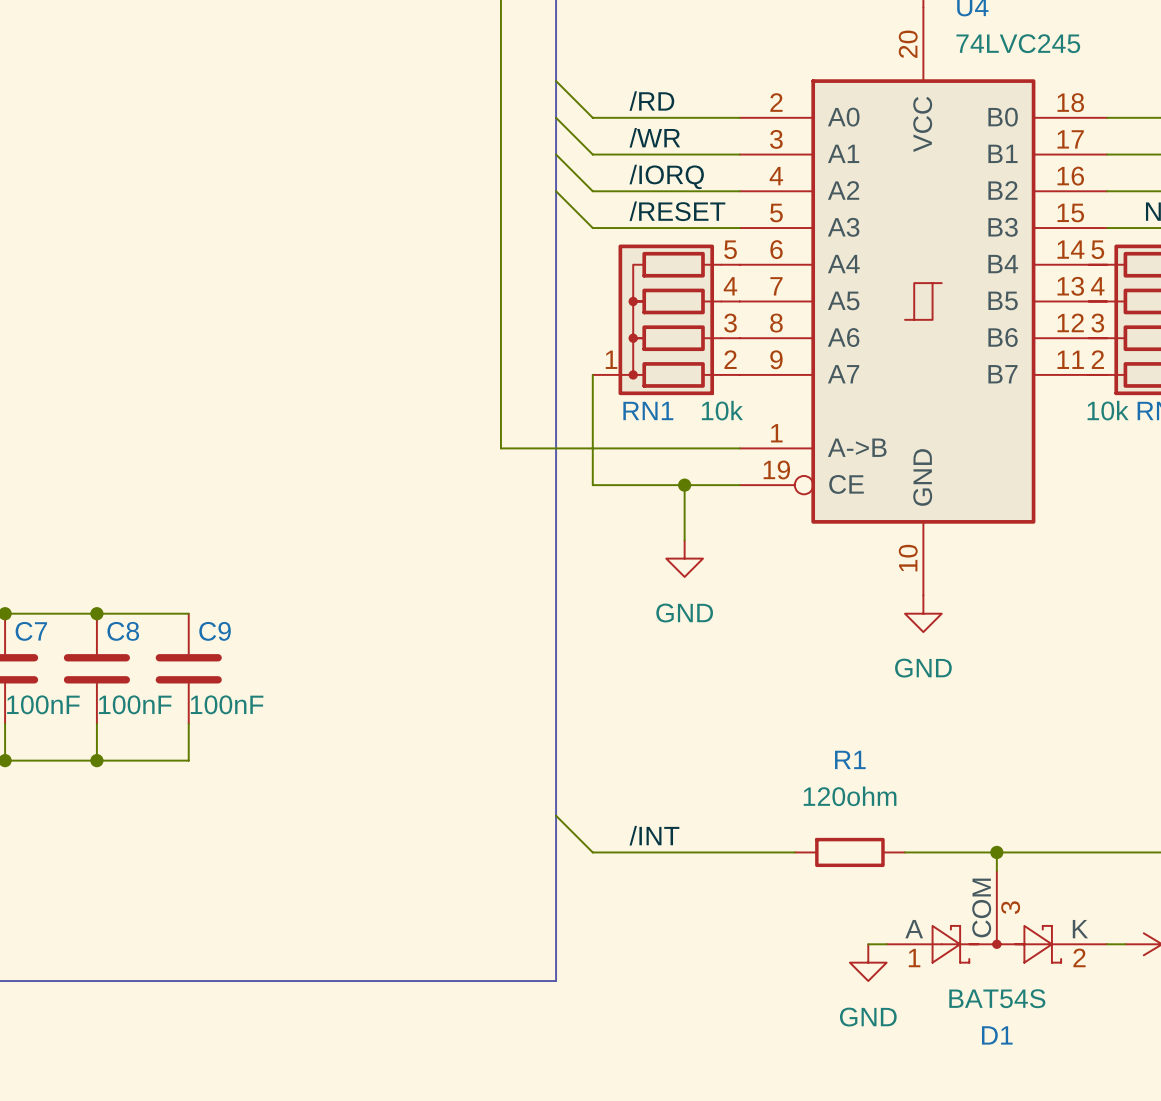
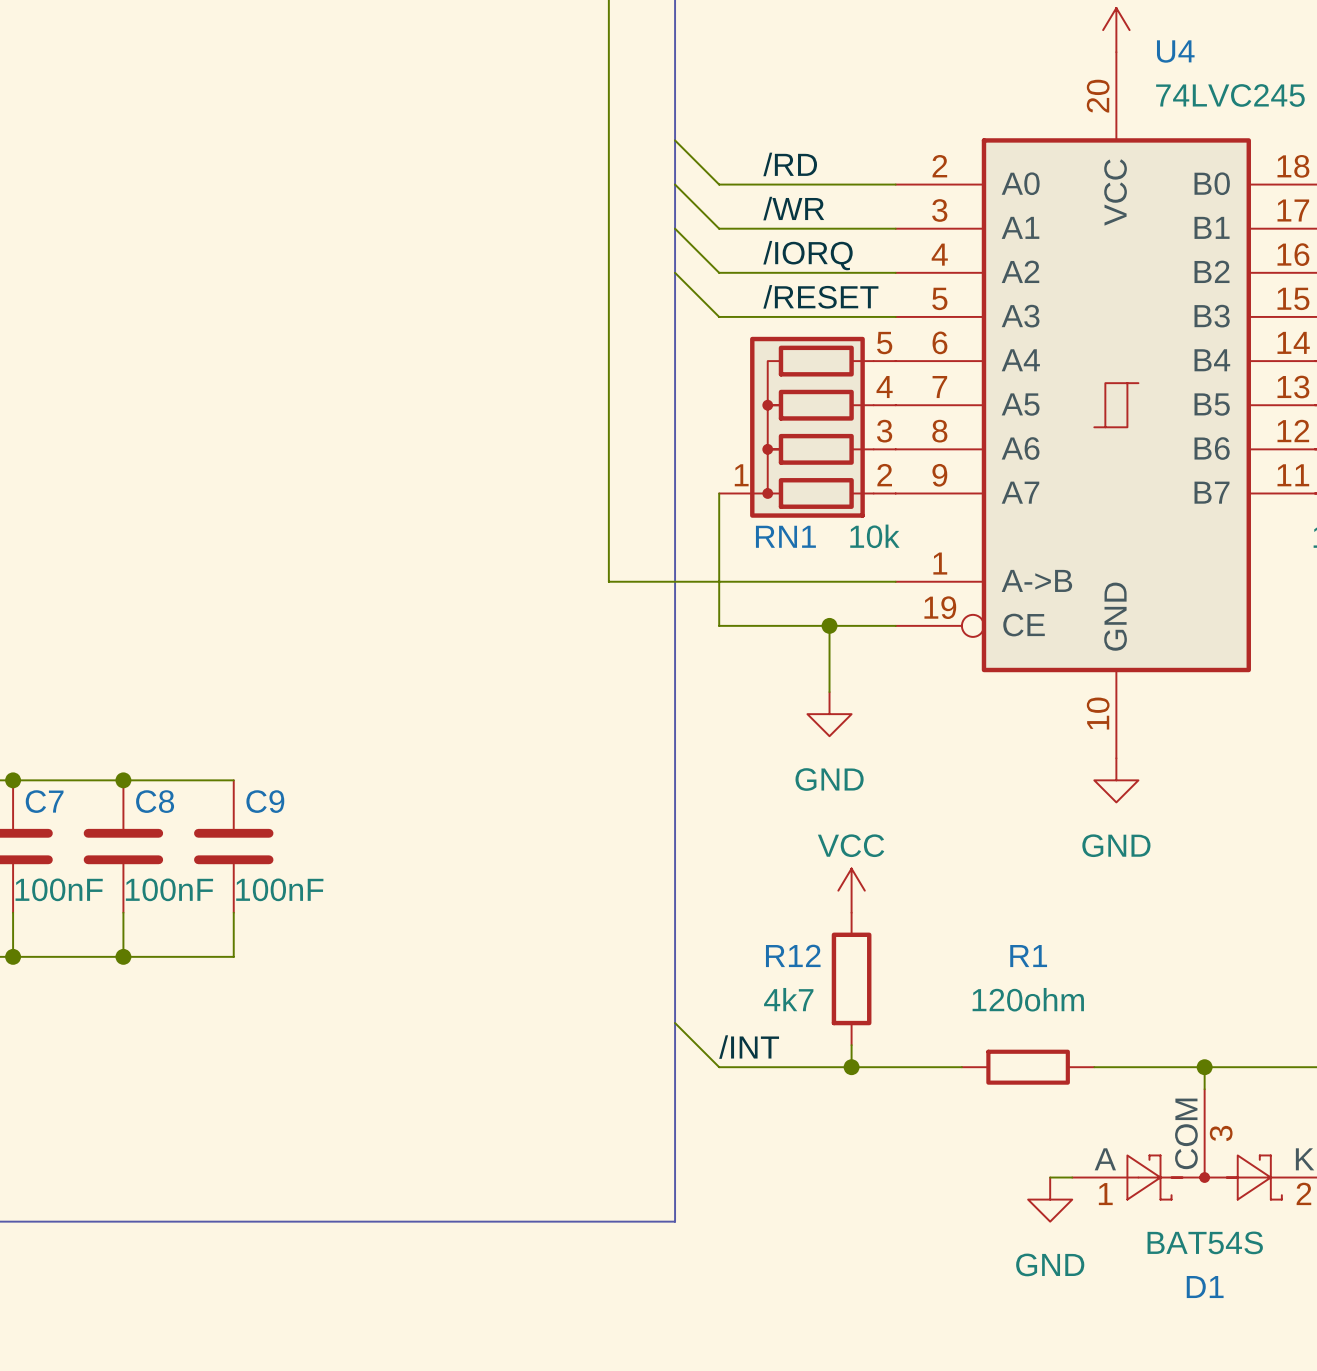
power symbol: none -> VCC (851, 890)
R12: none -> 4k7 (851, 978)
wire: none -> (851, 1045) (851, 1067)
label position: /INT (654, 835) -> /INT (749, 1047)
junction: none -> (851, 1067)

